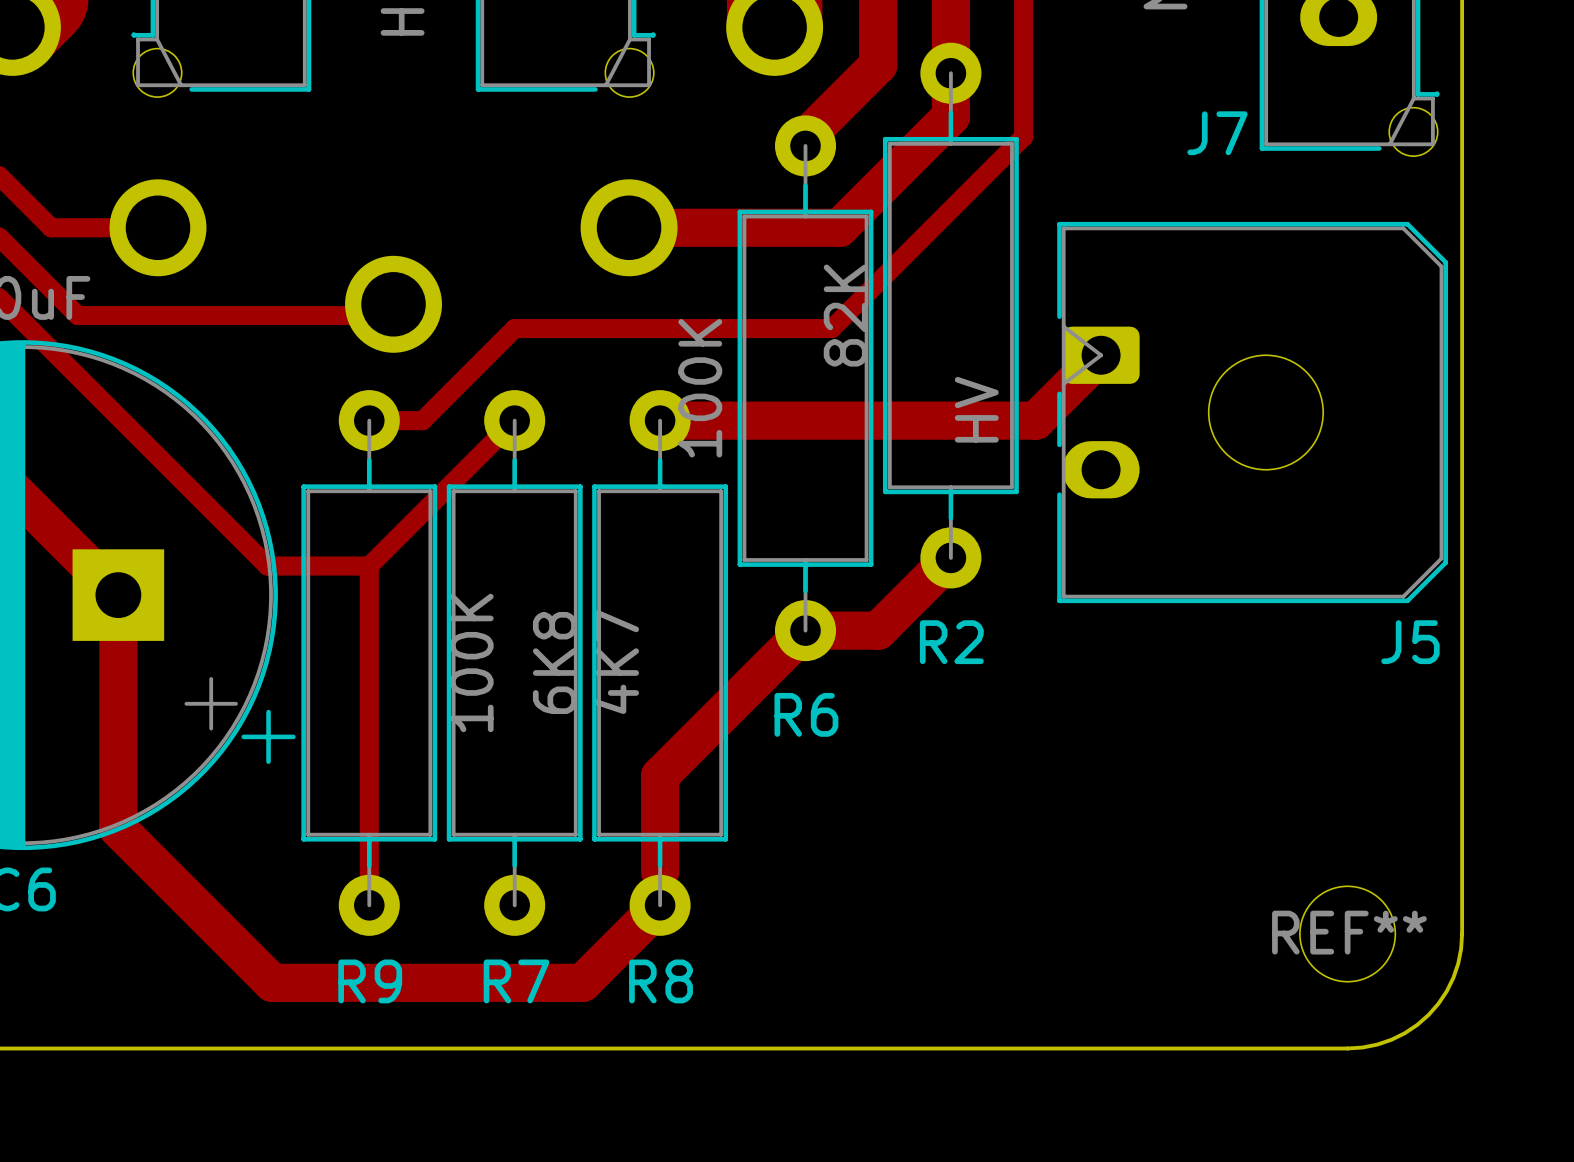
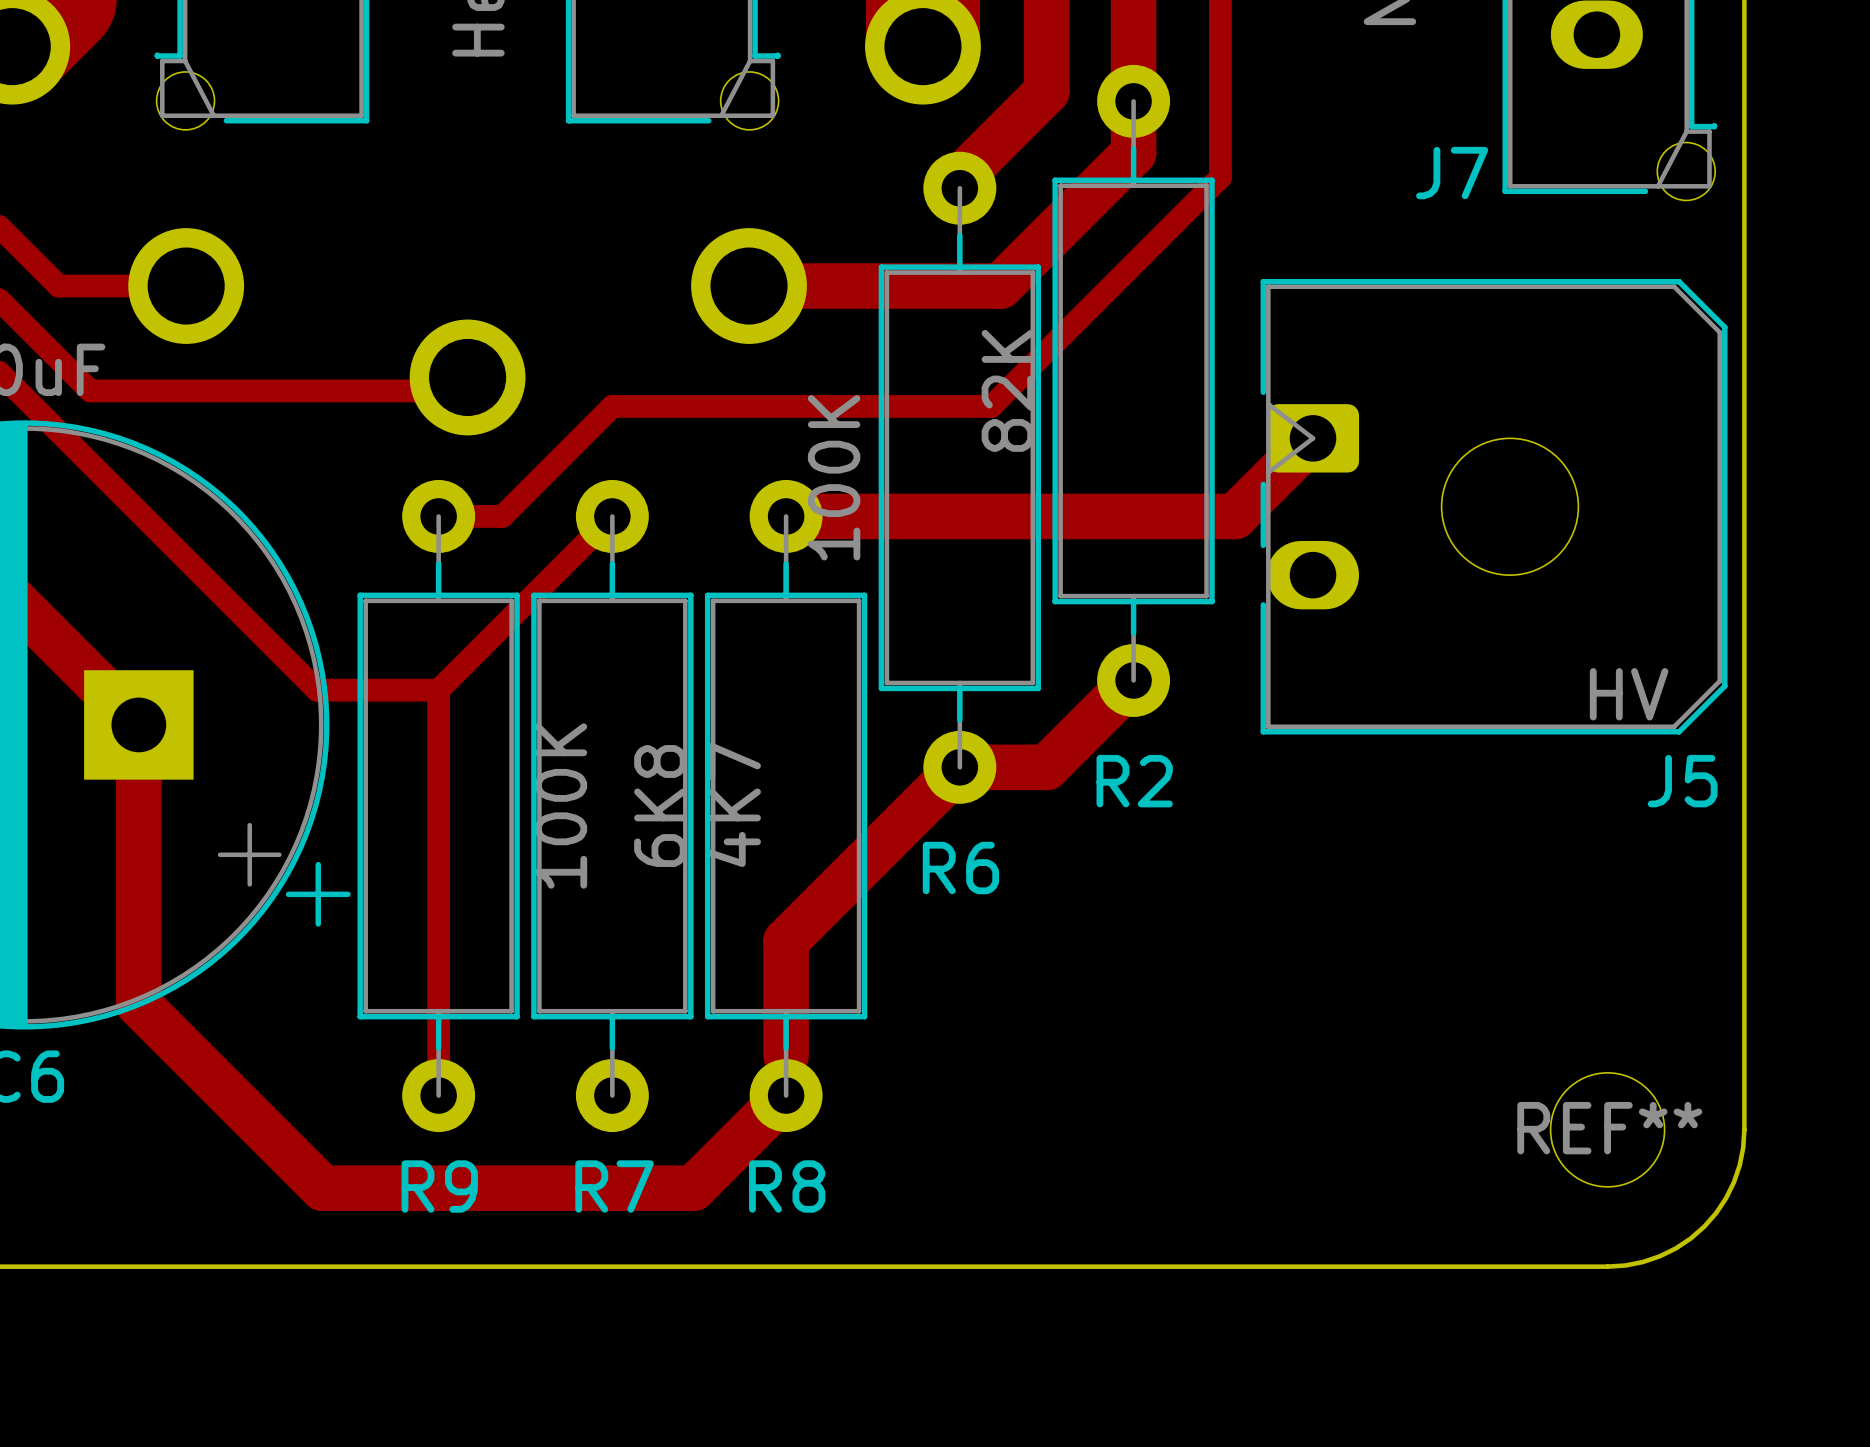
J5 value rotation: 0° (976, 409) -> 90° clockwise (1629, 694)
J5 value position: HV (976, 409) -> HV (1629, 694)

